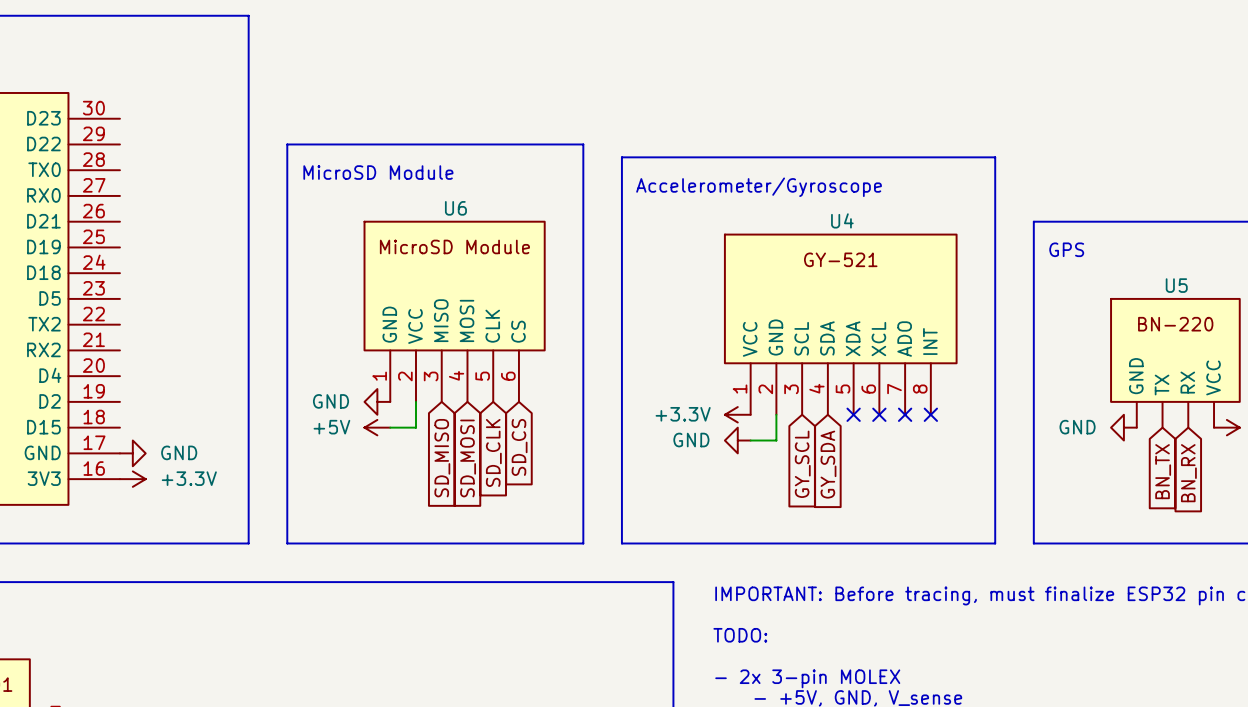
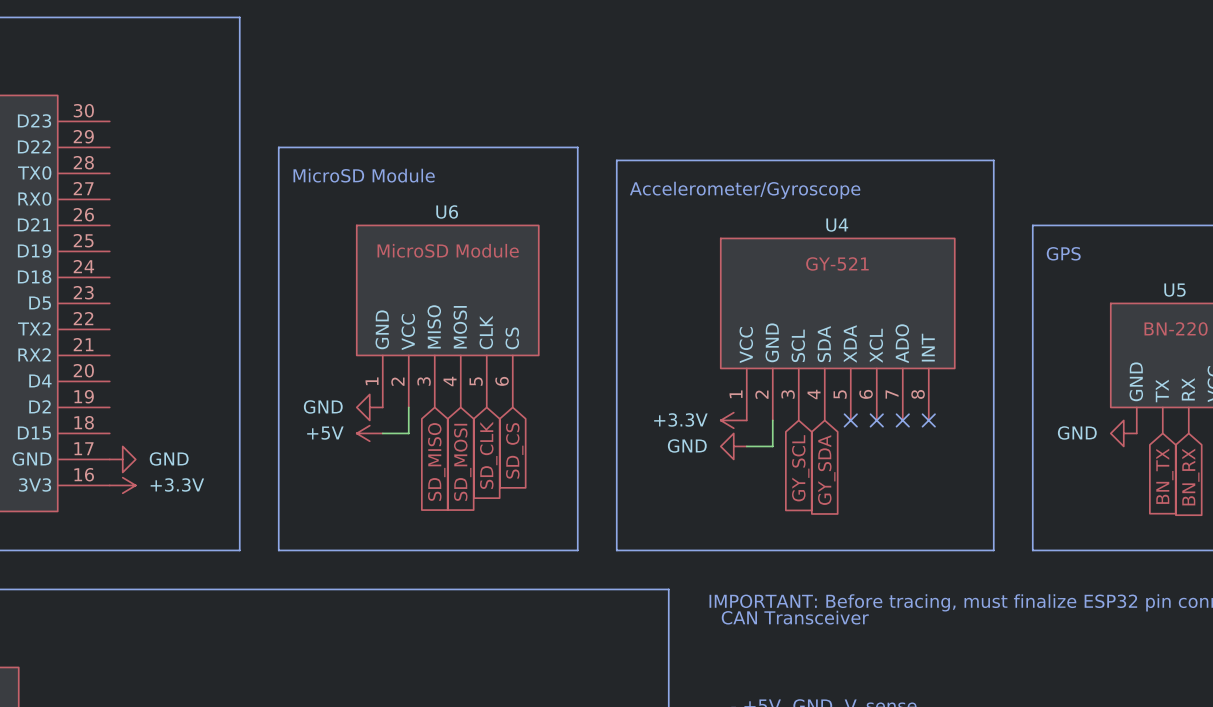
text: none -> CAN Transceiver (795, 617)
text: TODO: (740, 635) -> none
text: - 2x 3-pin MOLEX (807, 678) -> none

